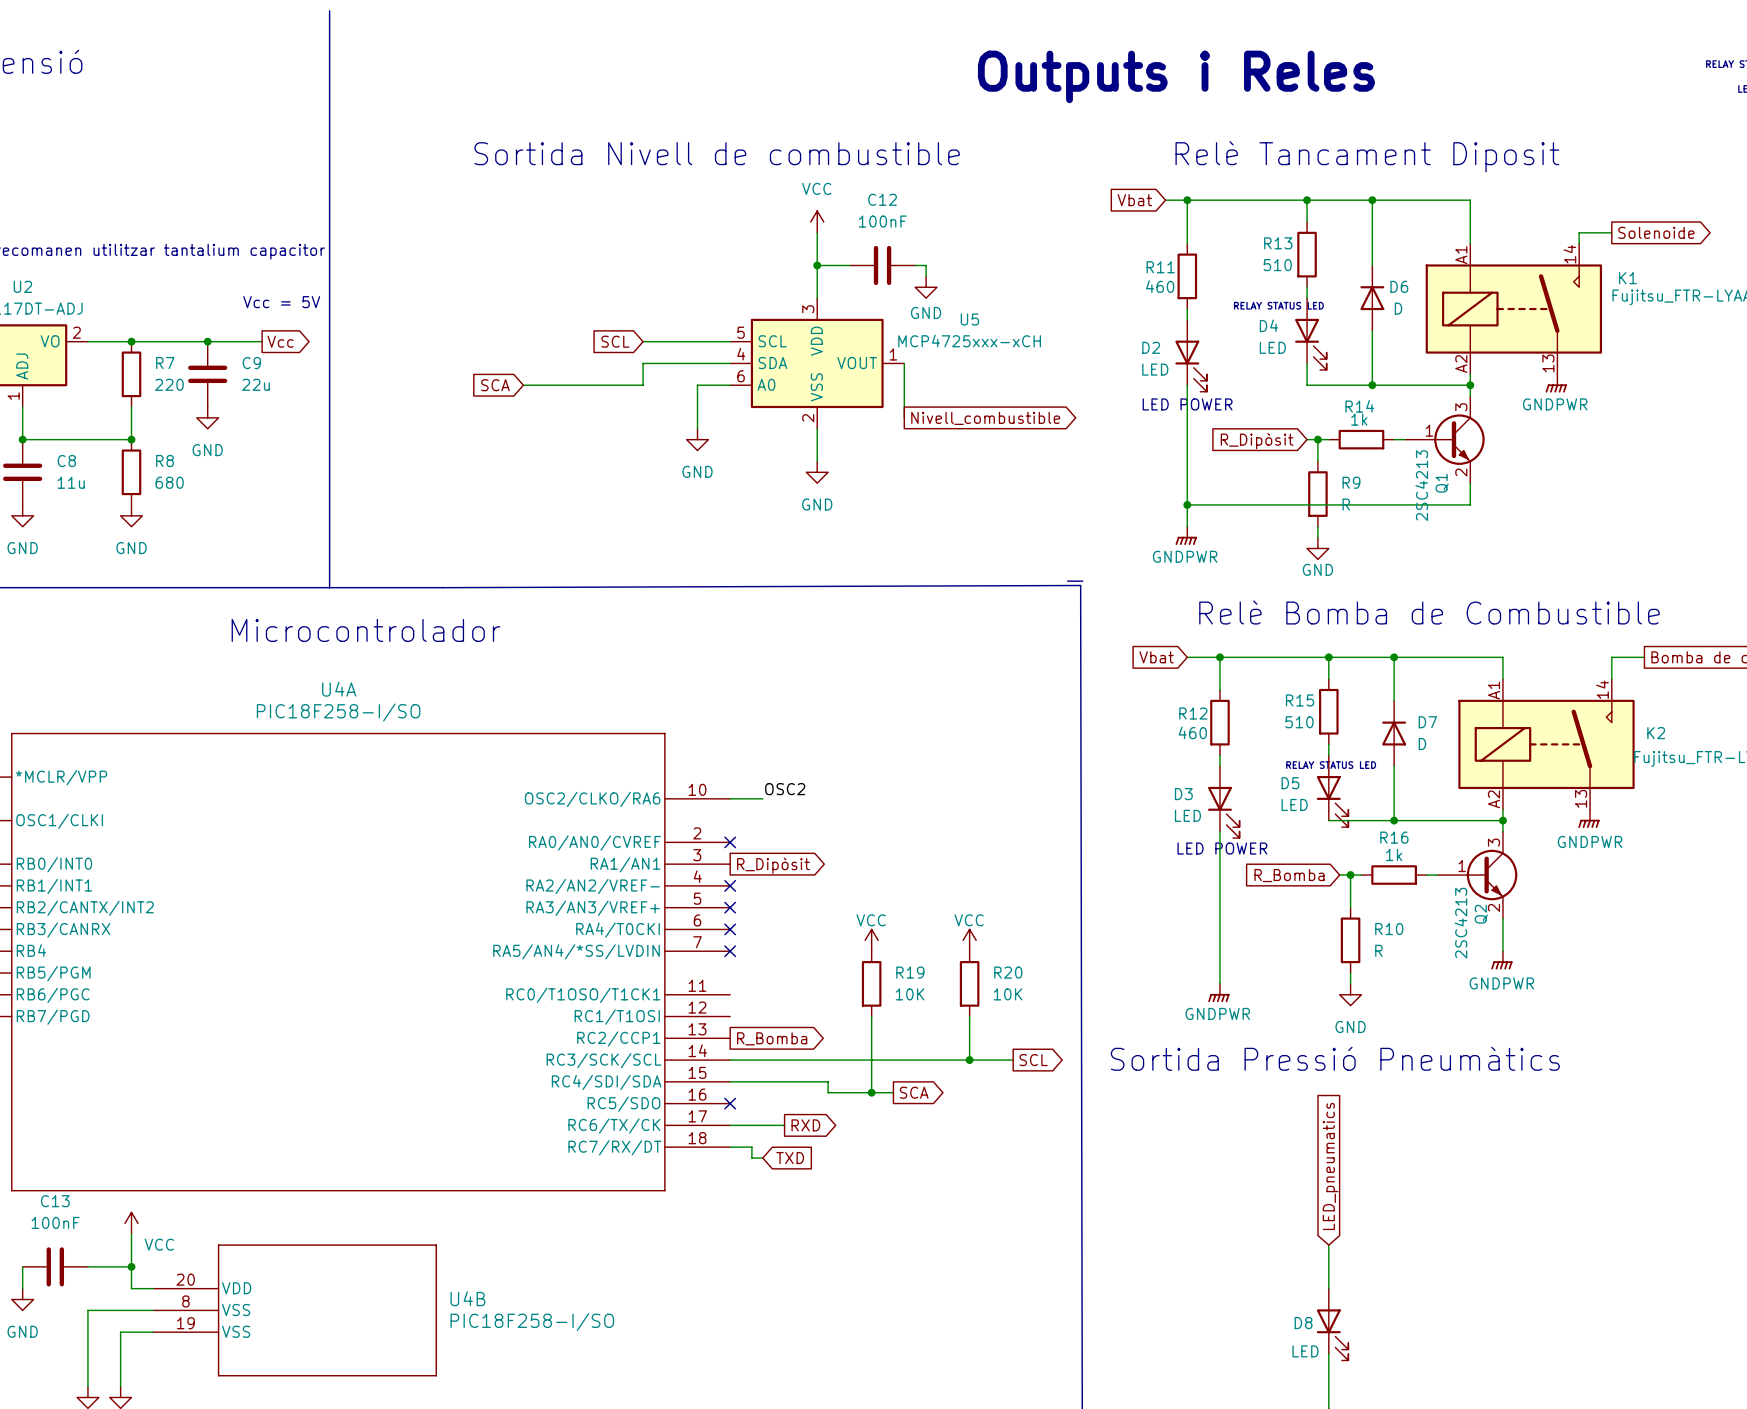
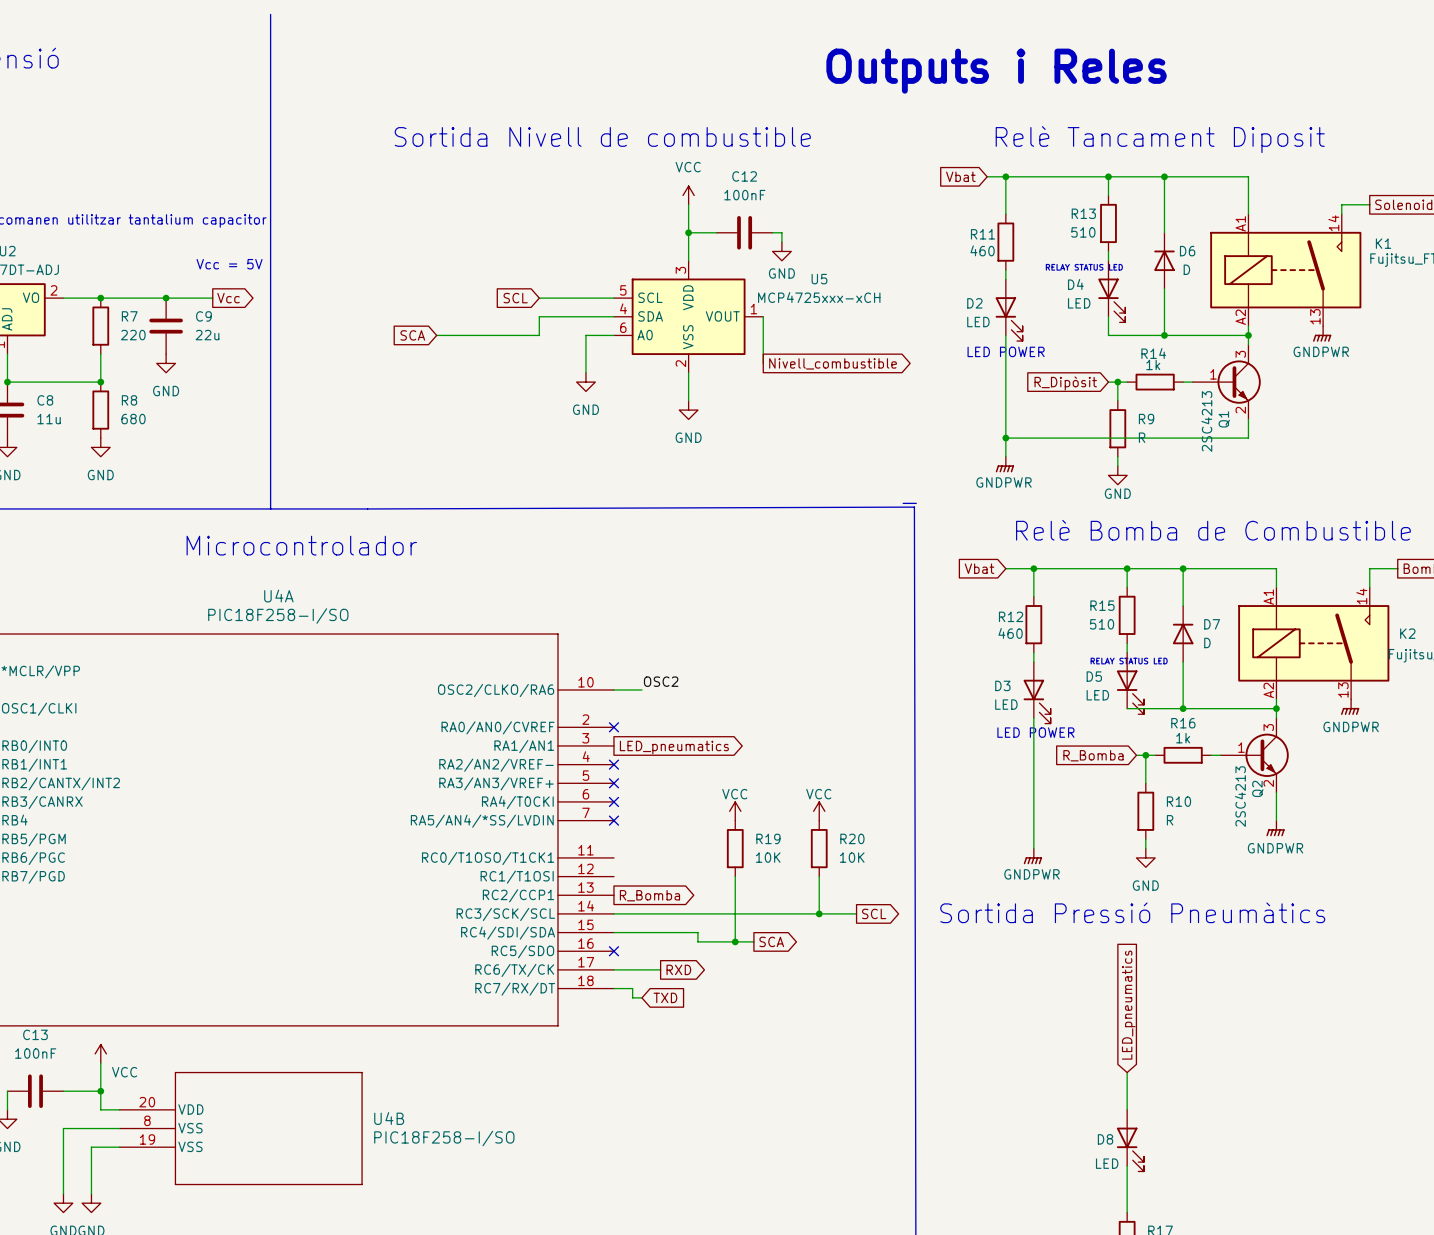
global label: R_Dipòsit (773, 865) -> LED_pneumatics (674, 747)

